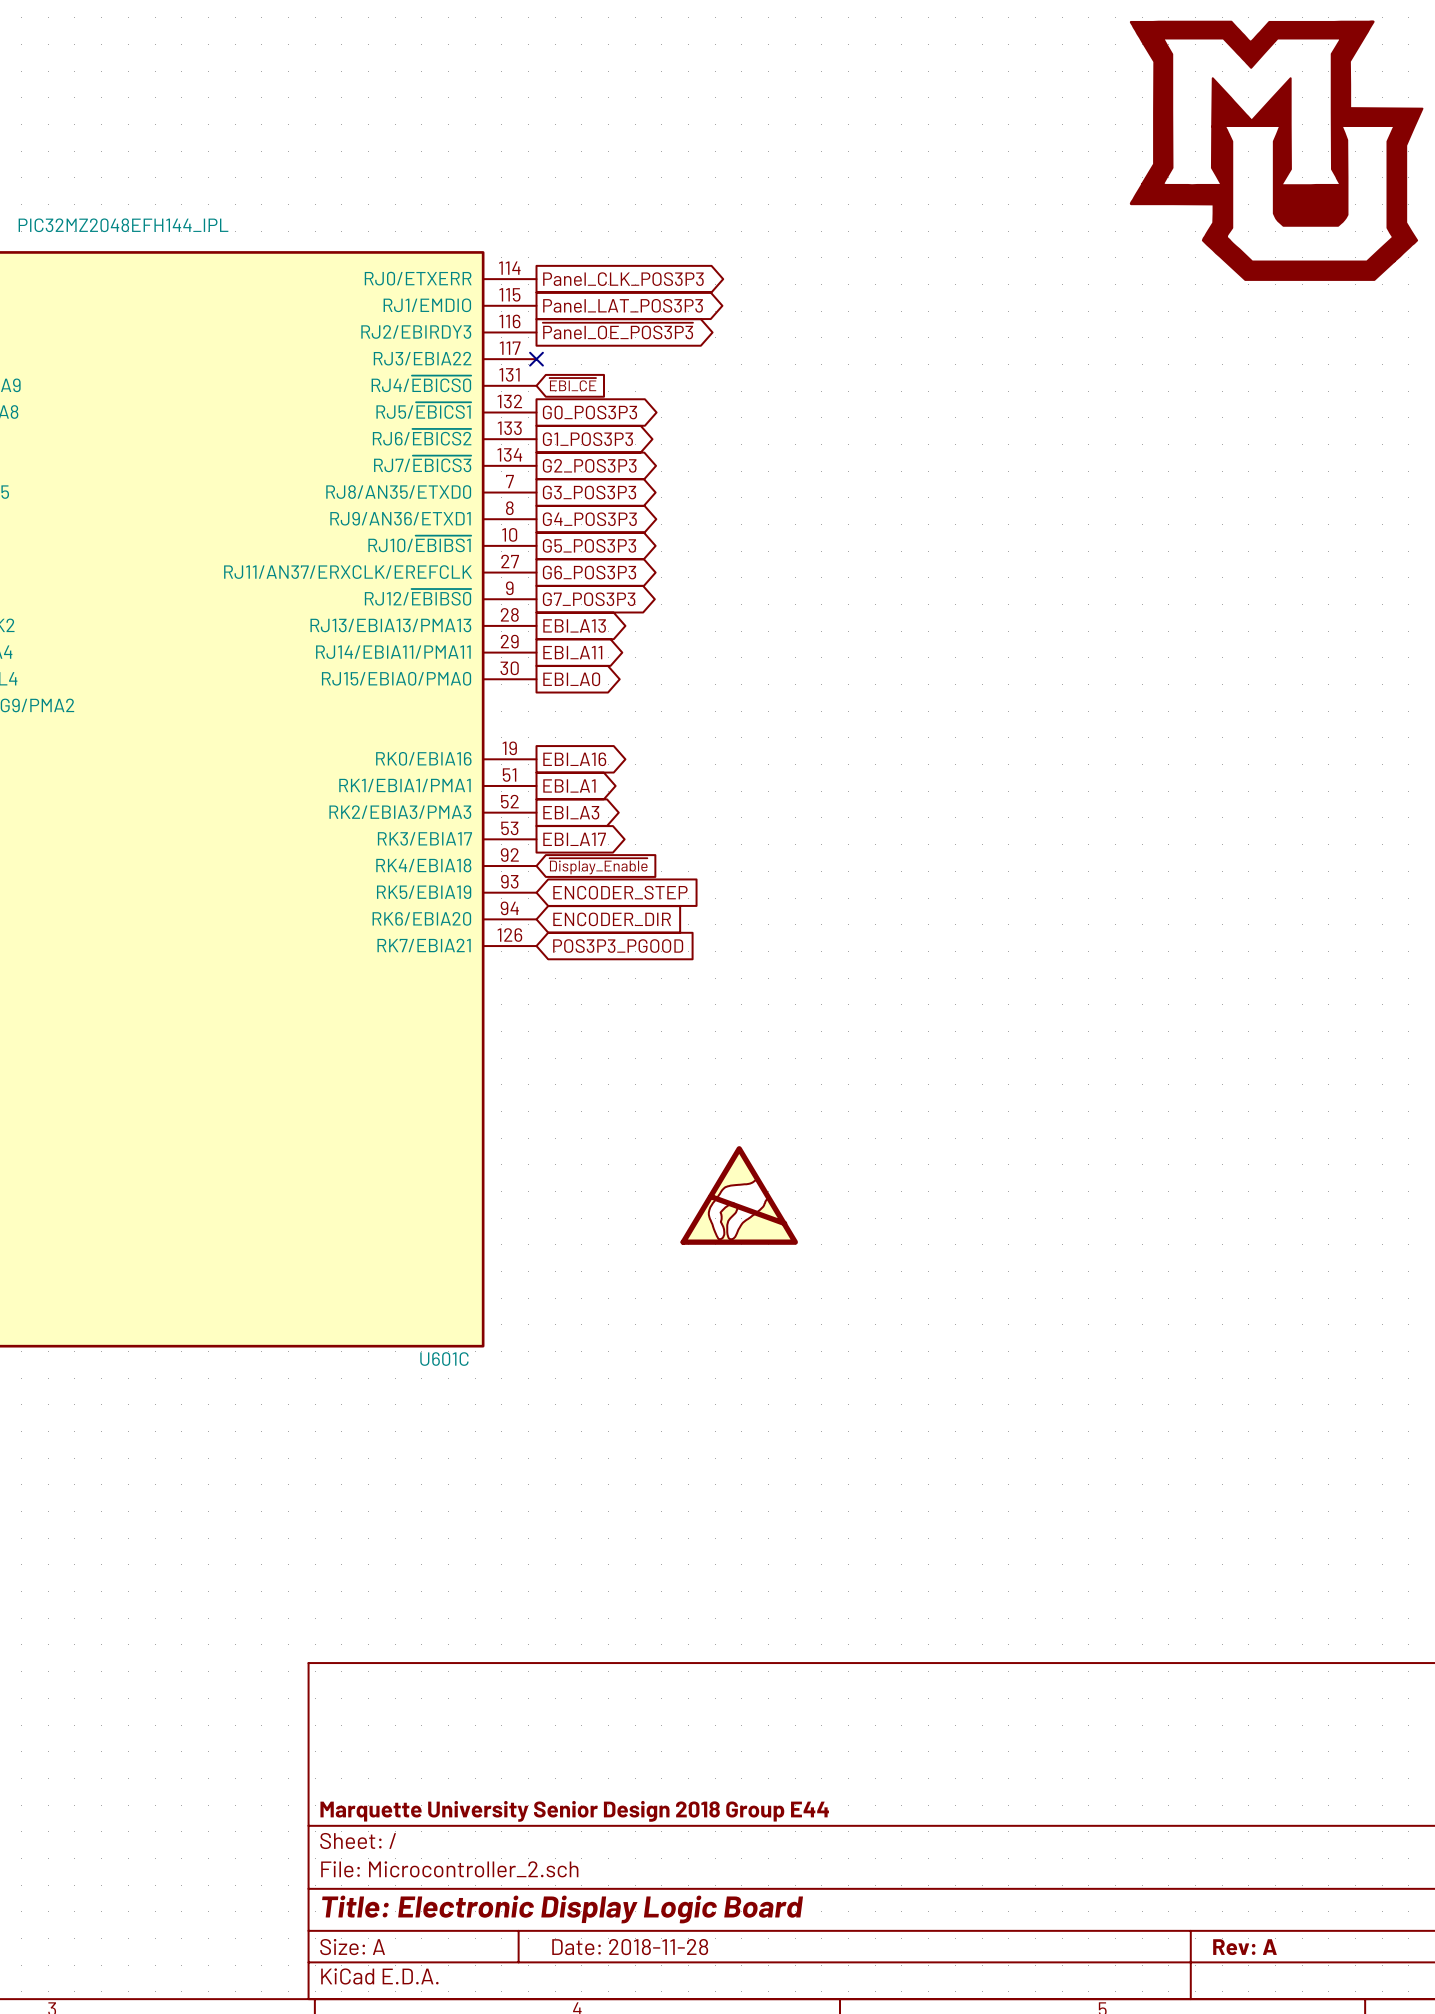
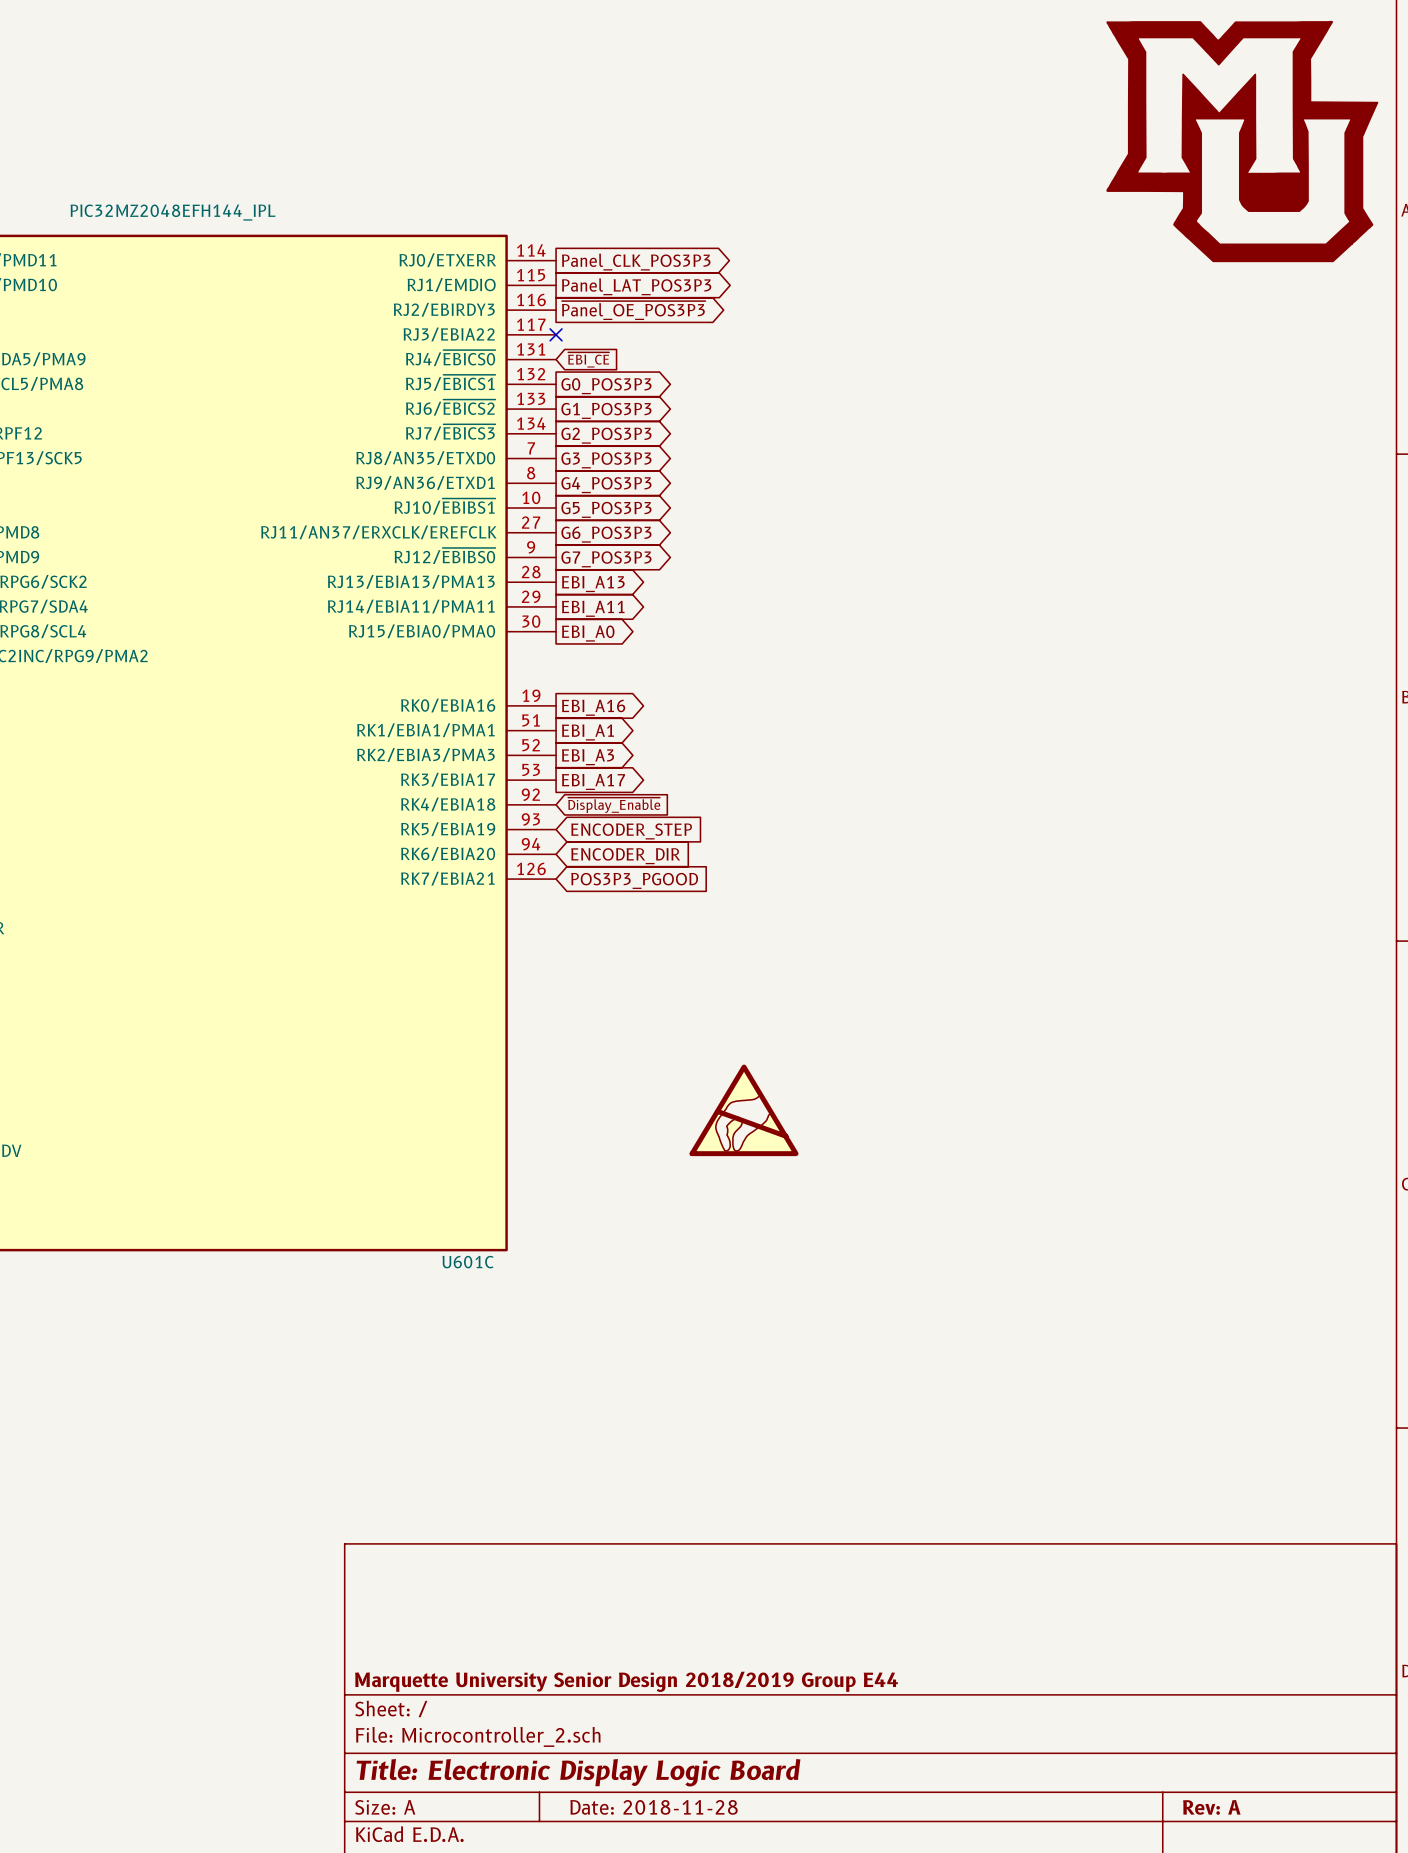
title block: Marquette University Senior Design 2018 Group E44 (574, 1811) -> Marquette University Senior Design 2018/2019 Group E44 (626, 1681)

